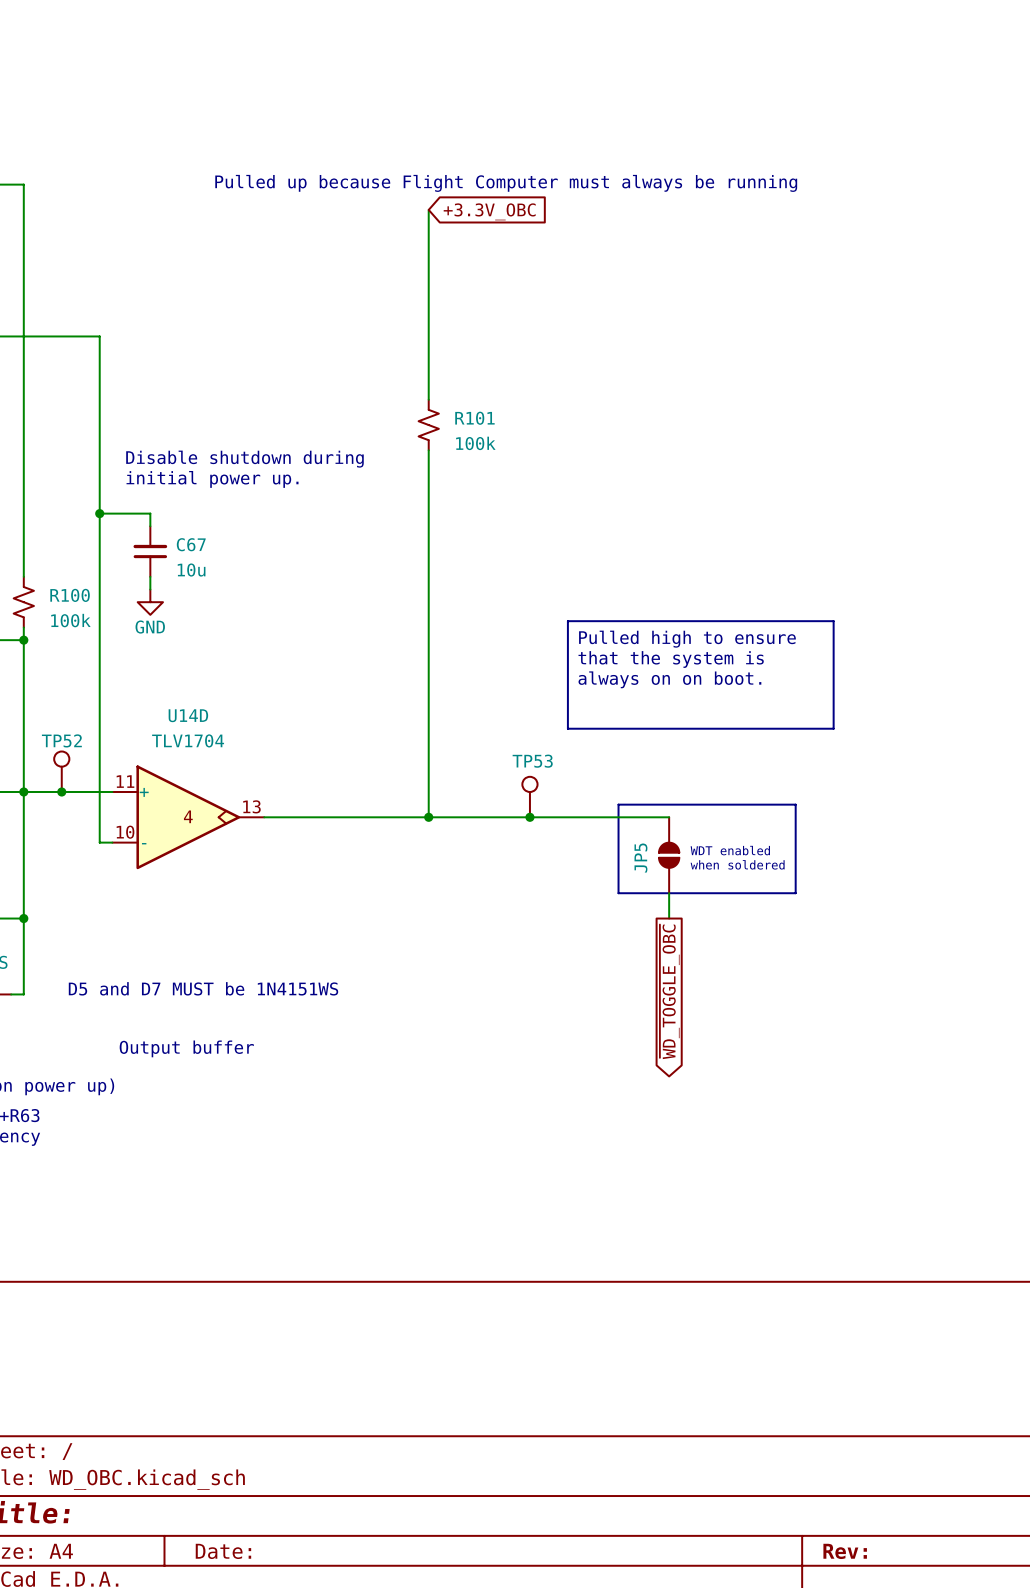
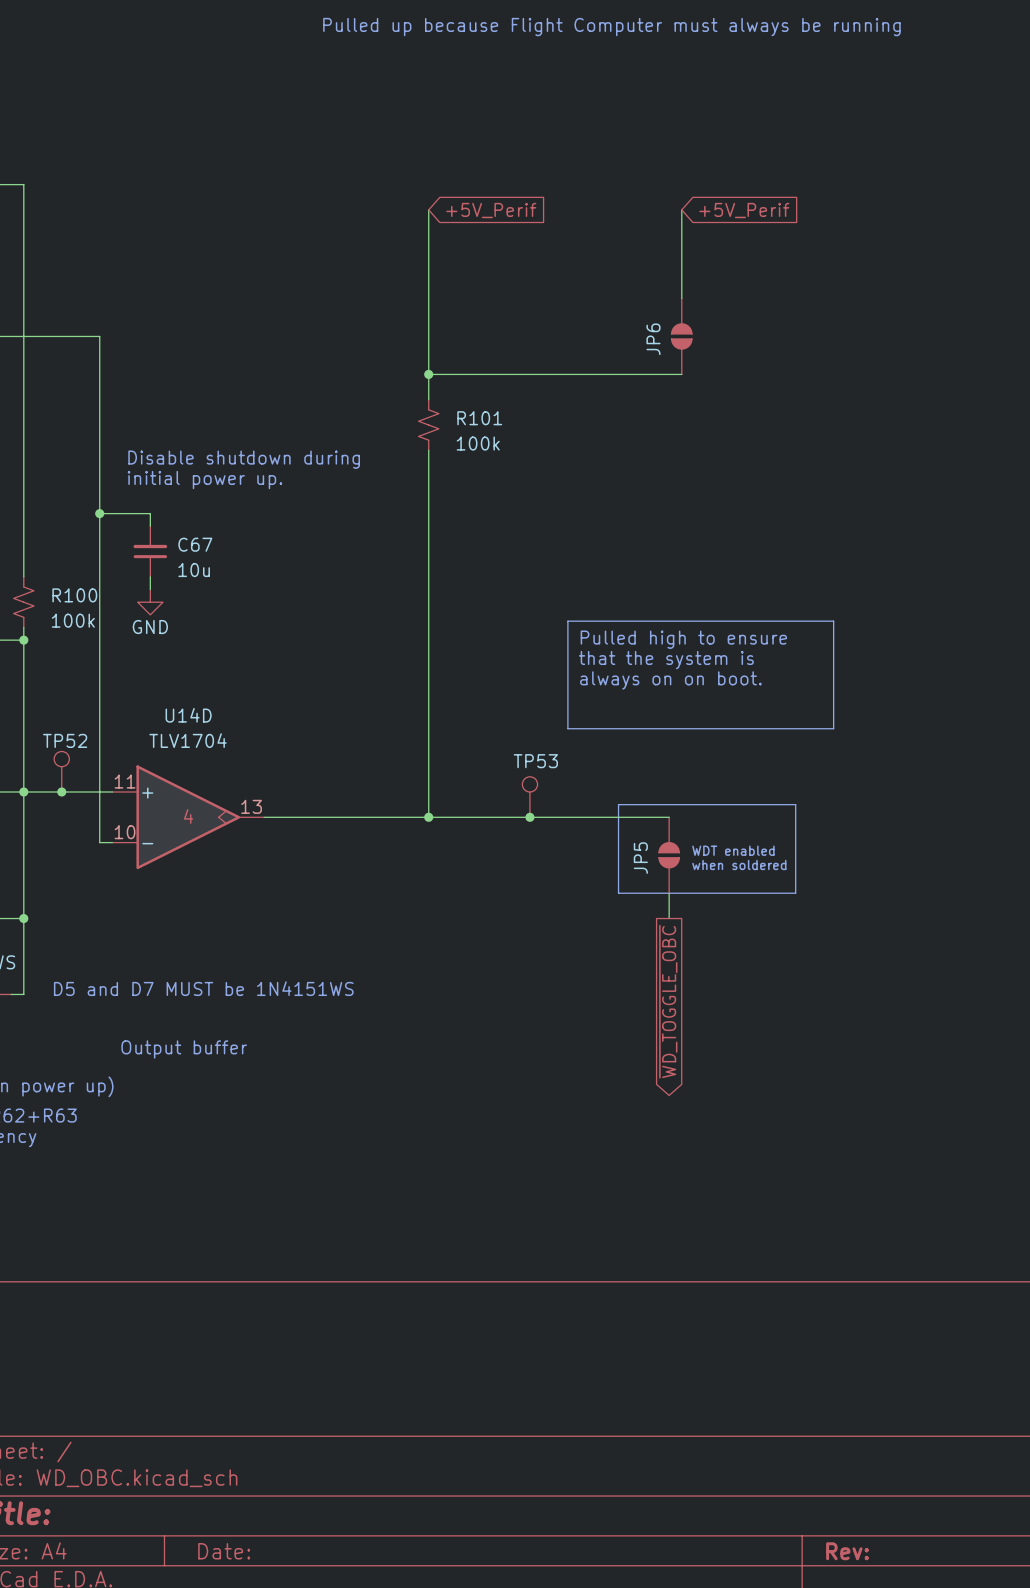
text position: Pulled up because Flight Computer must always be running (506, 183) -> Pulled up because Flight Computer must always be running (611, 27)
wire: none -> (681, 209) (681, 298)
global label: +3.3V_OBC (489, 211) -> +5V_Perif (491, 210)
global label: none -> +5V_Perif (744, 210)
JP6: none -> (681, 336)
wire: none -> (428, 374) (681, 374)
junction: none -> (428, 374)

